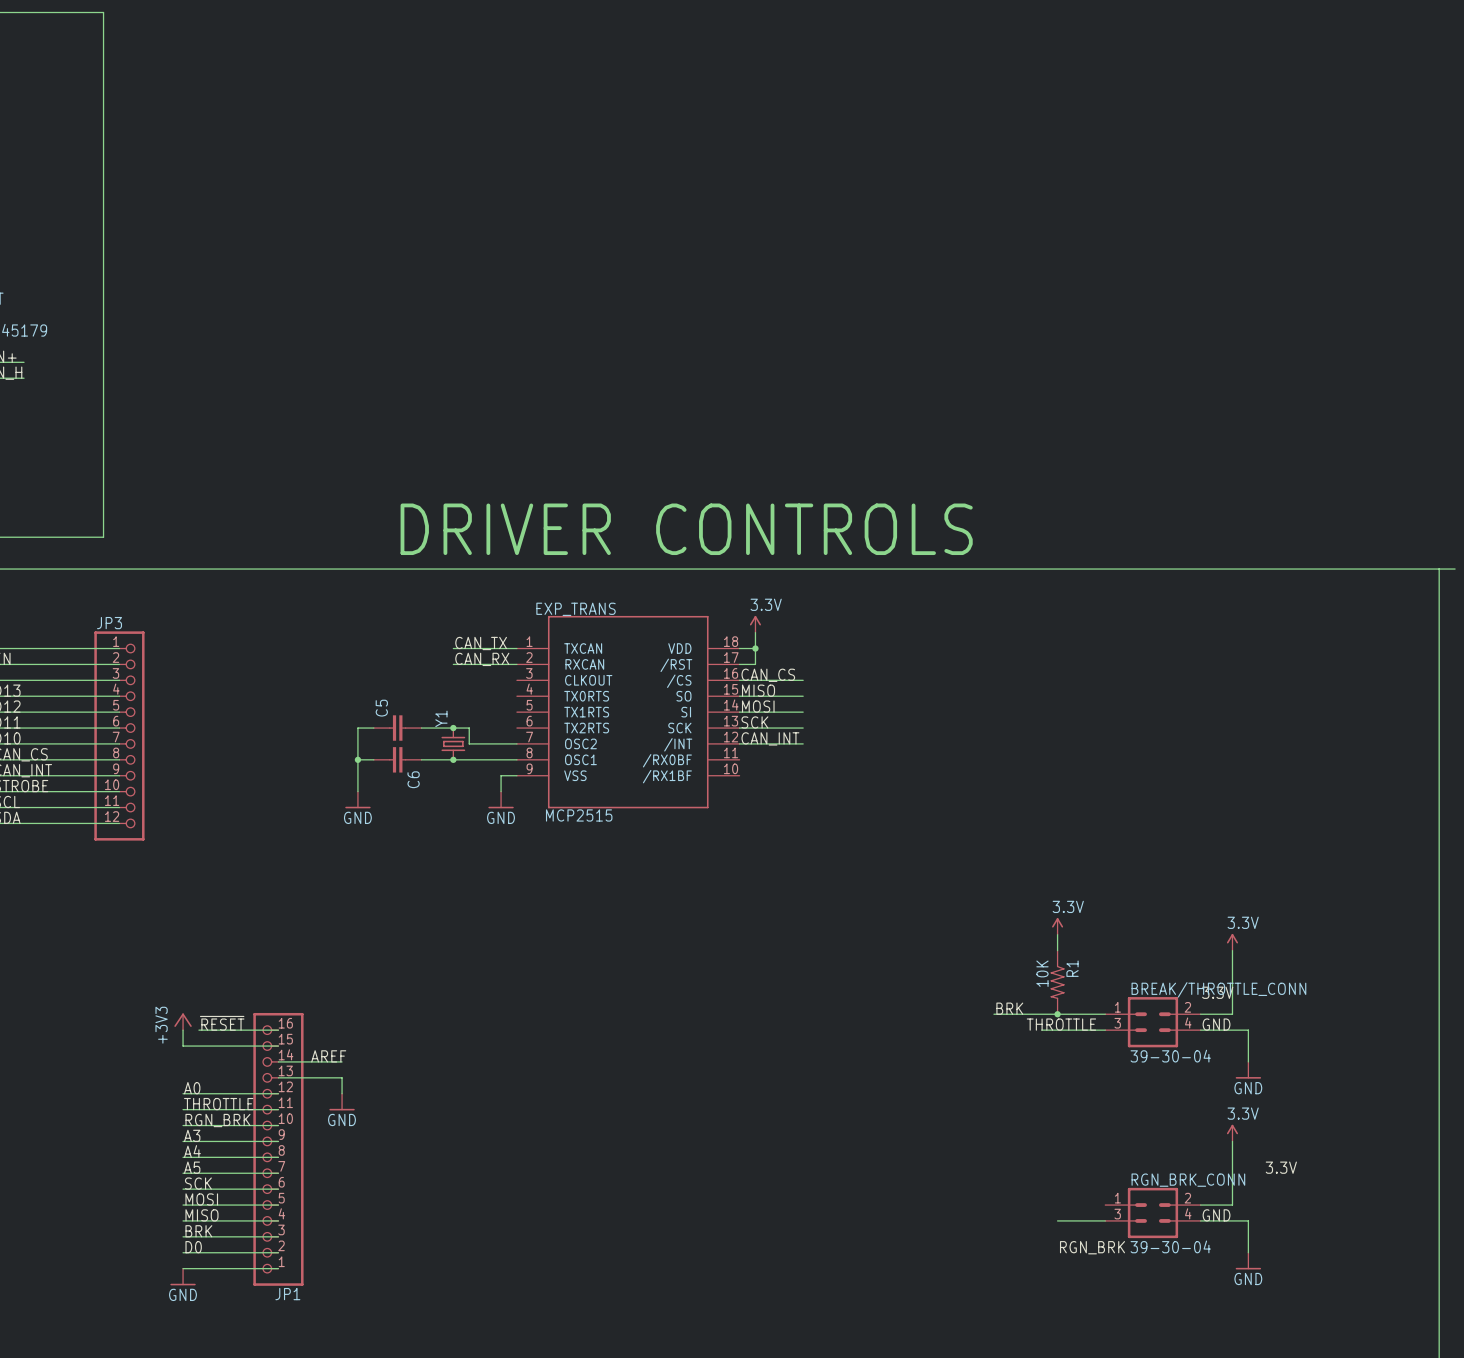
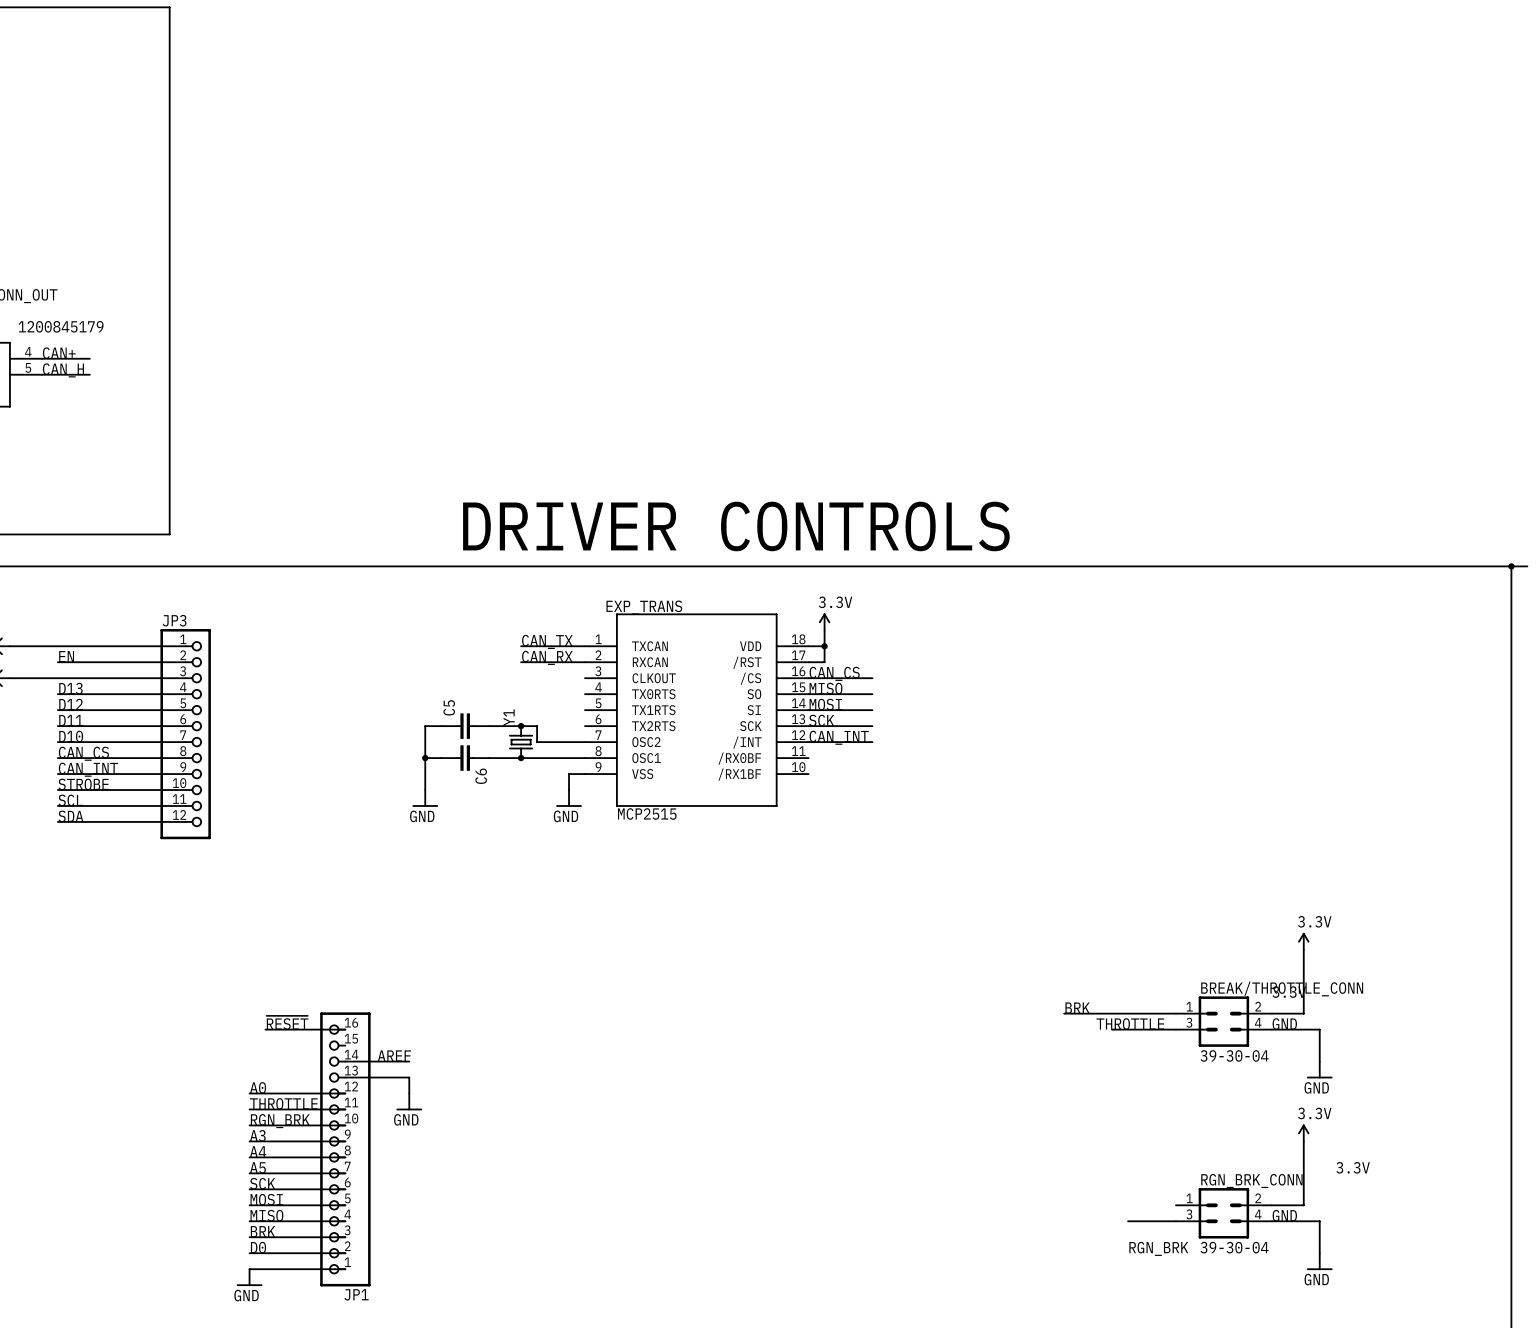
junction: none -> (1511, 566)
power symbol: 3.3V (1057, 926) -> none
wire: (1057, 934) (1057, 950) -> none
R1: 10K (1057, 982) -> none
junction: (1057, 1014) -> none
power symbol: +3V3 (183, 1021) -> none
wire: (183, 1030) (183, 1046) (278, 1046) -> none

